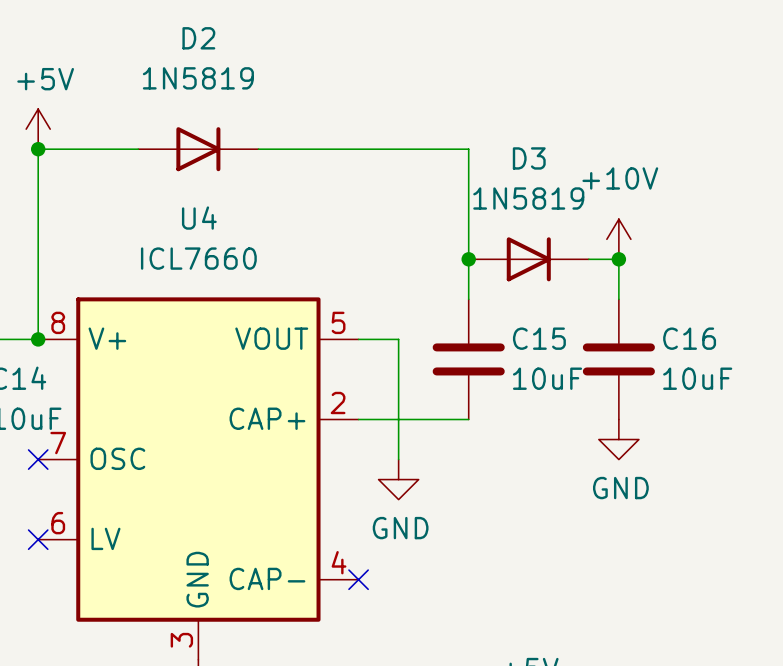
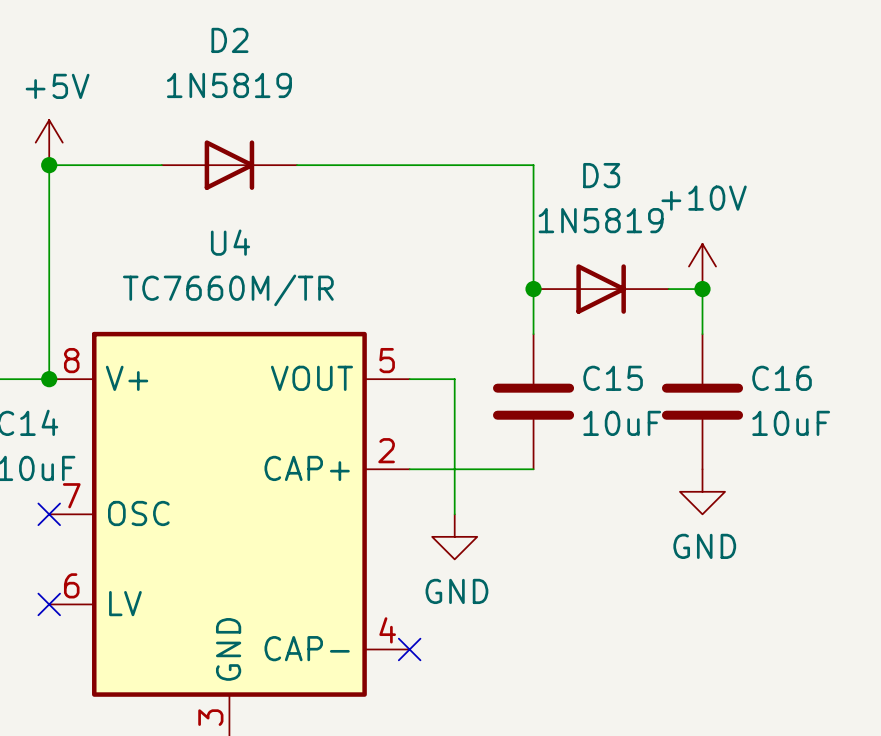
U4 value: ICL7660 (198, 258) -> TC7660M/TR (228, 290)

